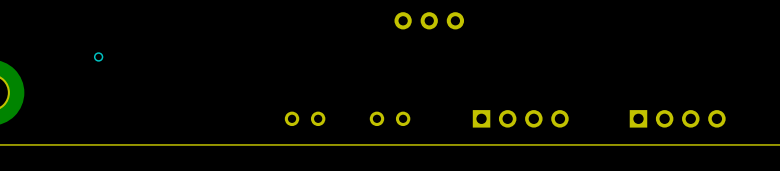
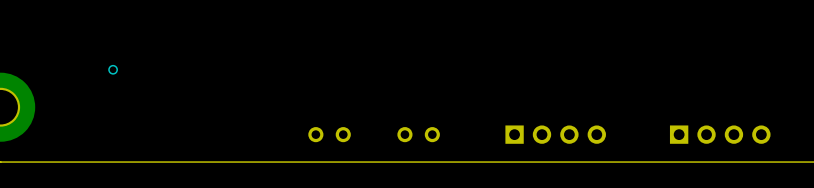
part: (429, 20) -> none

